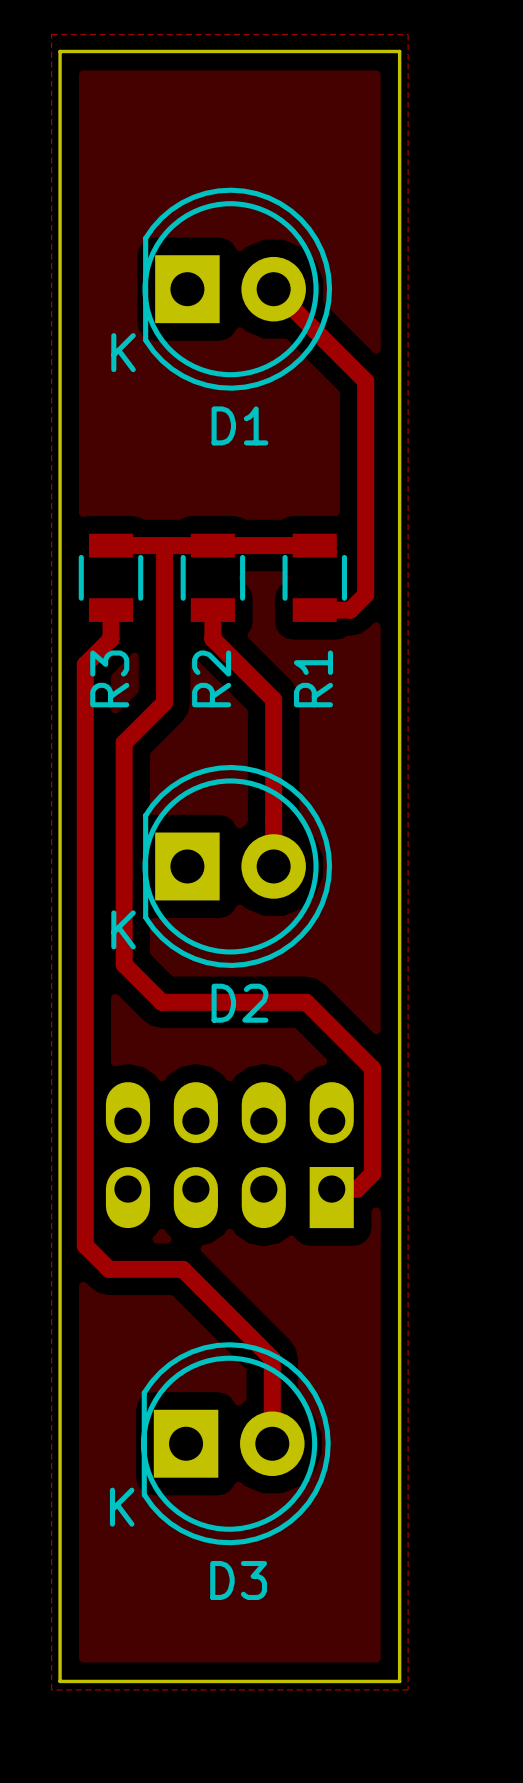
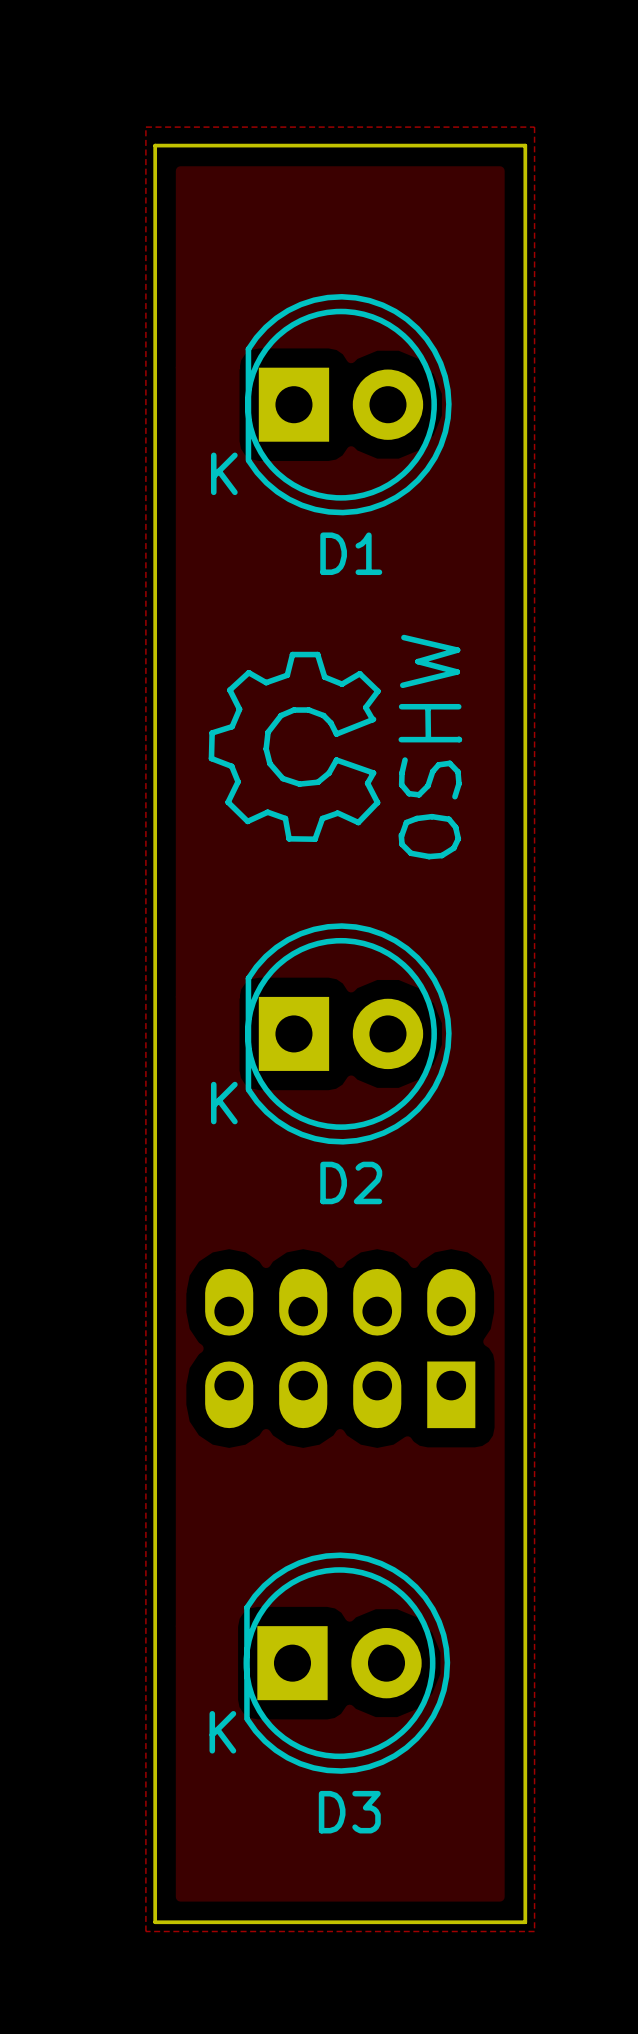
track: (273, 289) (365, 381) (365, 594) (350, 610) (314, 610) -> none
drawing: none -> [208, 634, 463, 860]
track: (111, 545) (314, 545) -> none
track: (164, 545) (164, 702) (124, 742) (124, 964) (161, 1002) (306, 1002) (372, 1068) (372, 1173) (357, 1189) (331, 1189) -> none
R3: (111, 577) -> none
R2: (212, 577) -> none
R1: (314, 577) -> none
track: (111, 610) (111, 638) (85, 664) (85, 1245) (109, 1269) (182, 1269) (272, 1358) (272, 1443) -> none
track: (212, 610) (212, 638) (273, 699) (273, 866) -> none

